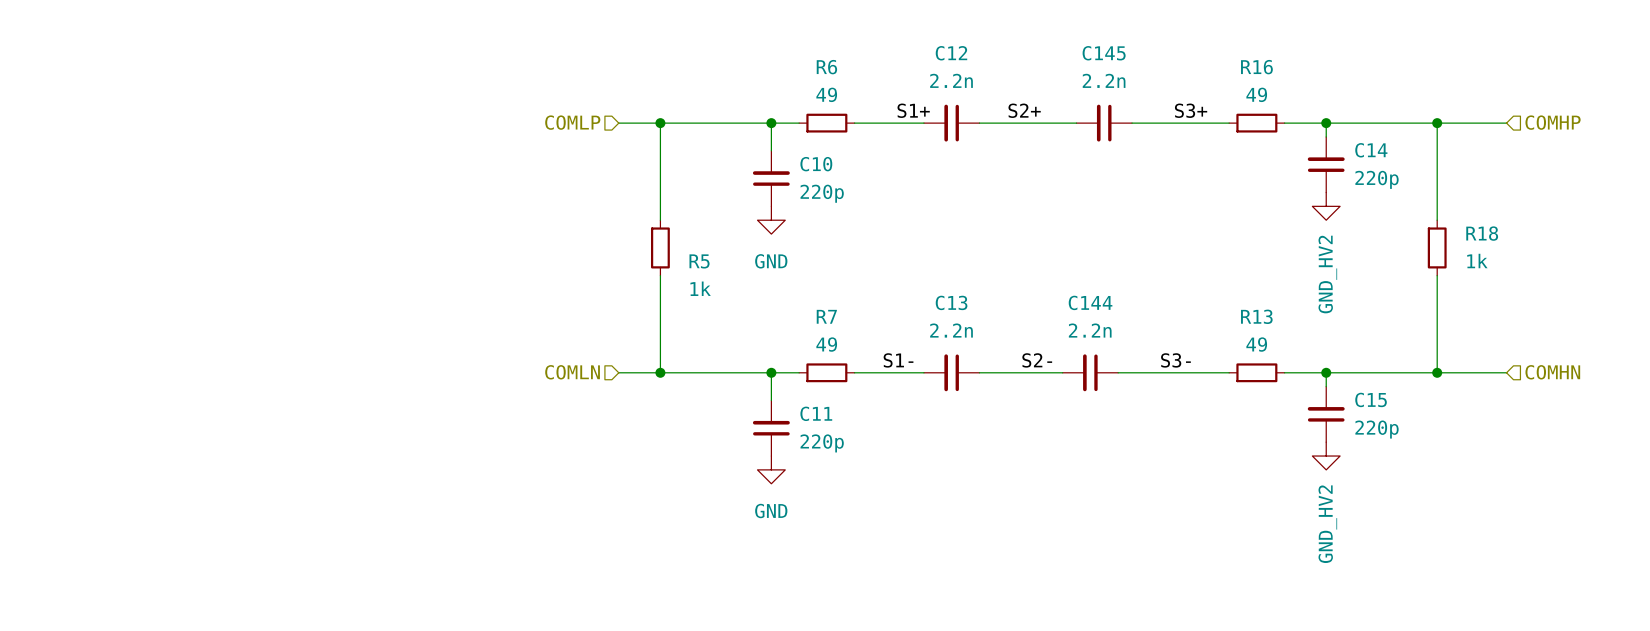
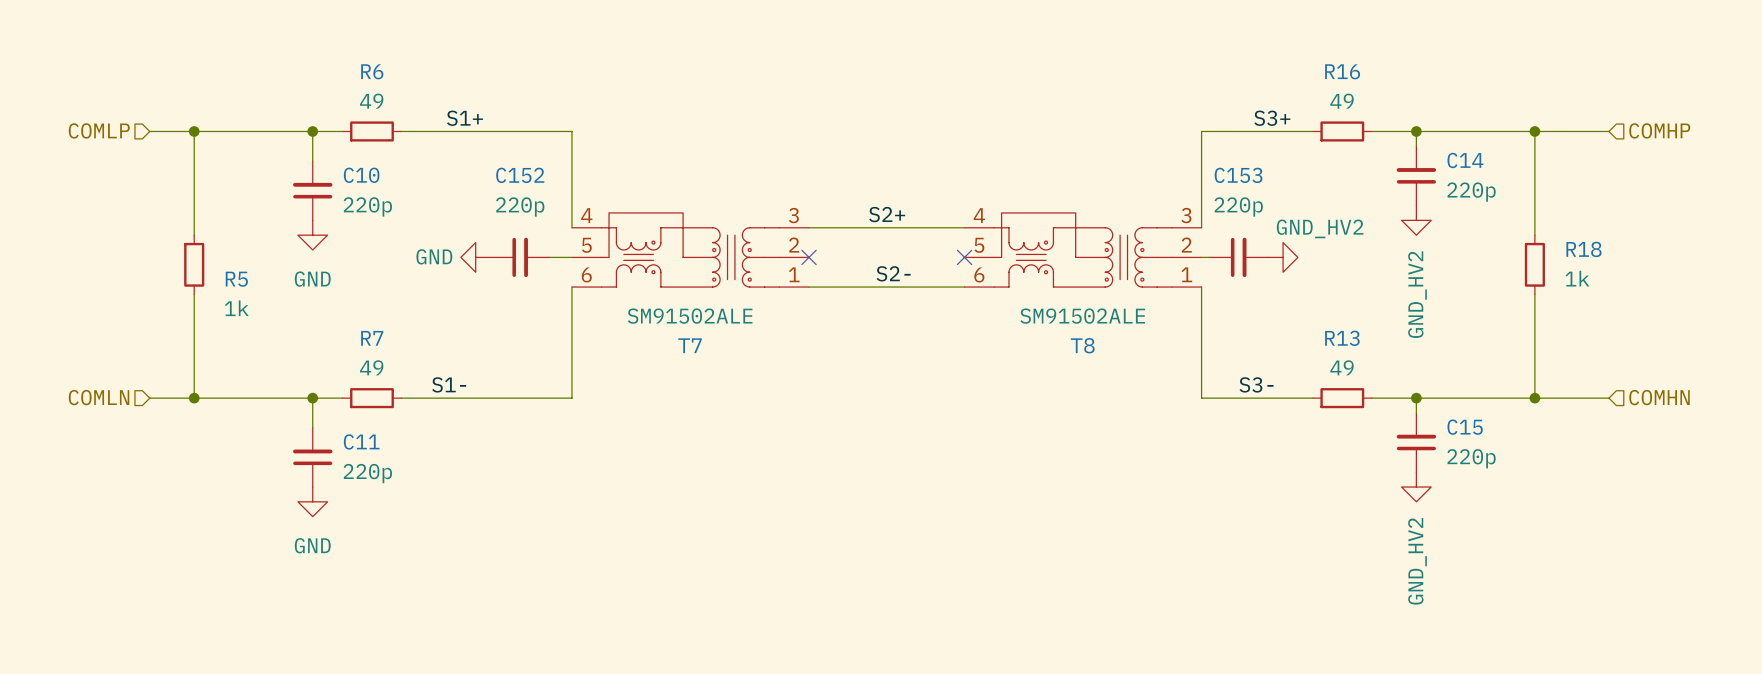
label: none -> S1+ (464, 118)
label: S1+ (913, 110) -> none
label position: S2+ (1024, 110) -> S2+ (887, 214)
hierarchical label: none -> COMLP (99, 130)
hierarchical label: COMLP (572, 122) -> none
wire: none -> (149, 131) (342, 131)
wire: none -> (194, 131) (194, 235)
junction: none -> (194, 131)
wire: none -> (312, 131) (312, 161)
junction: none -> (312, 131)
wire: none -> (401, 131) (571, 131) (571, 227)
wire: (618, 123) (799, 123) -> none
wire: (660, 123) (660, 220) -> none
junction: (660, 123) -> none
wire: (771, 123) (771, 150) -> none
junction: (771, 123) -> none
R6 position: (826, 123) -> (371, 131)
wire: (854, 123) (923, 123) -> none
C12: 2.2n (951, 123) -> none
wire: (979, 123) (1076, 123) -> none
C145: 2.2n (1104, 123) -> none
wire: none -> (1208, 131) (1201, 131) (1201, 227)
C10 position: (771, 178) -> (312, 190)
wire: none -> (809, 227) (964, 227)
power symbol: none -> GND (312, 235)
power symbol: GND (771, 220) -> none
T7: none -> SM91502ALE (690, 249)
T8: none -> SM91502ALE (1083, 249)
power symbol: none -> GND (475, 257)
C152: none -> 220p (520, 257)
wire: none -> (549, 257) (571, 257)
no-connect mark: none -> (809, 257)
no-connect mark: none -> (964, 257)
wire: none -> (1201, 257) (1208, 257)
C153: none -> 220p (1238, 257)
power symbol: none -> GND_HV2 (1283, 257)
R5 position: (660, 247) -> (194, 264)
wire: none -> (571, 287) (571, 398) (401, 398)
wire: none -> (809, 287) (964, 287)
wire: none -> (194, 294) (194, 398)
wire: (660, 275) (660, 372) -> none
label: none -> S1- (449, 384)
label: S1- (898, 360) -> none
label position: S2- (1037, 360) -> S2- (893, 273)
hierarchical label: none -> COMLN (99, 397)
wire: none -> (149, 398) (342, 398)
junction: none -> (194, 398)
wire: none -> (312, 398) (312, 427)
junction: none -> (312, 398)
hierarchical label: COMLN (572, 372) -> none
wire: (618, 372) (799, 372) -> none
junction: (660, 372) -> none
wire: (771, 372) (771, 400) -> none
junction: (771, 372) -> none
R7 position: (826, 372) -> (371, 398)
wire: (854, 372) (923, 372) -> none
C13: 2.2n (951, 372) -> none
wire: (979, 372) (1062, 372) -> none
C144: 2.2n (1090, 372) -> none
wire: (1118, 372) (1125, 372) -> (1201, 287) (1201, 398)
C11 position: (771, 428) -> (312, 457)
power symbol: none -> GND (312, 501)
power symbol: GND (771, 469) -> none

